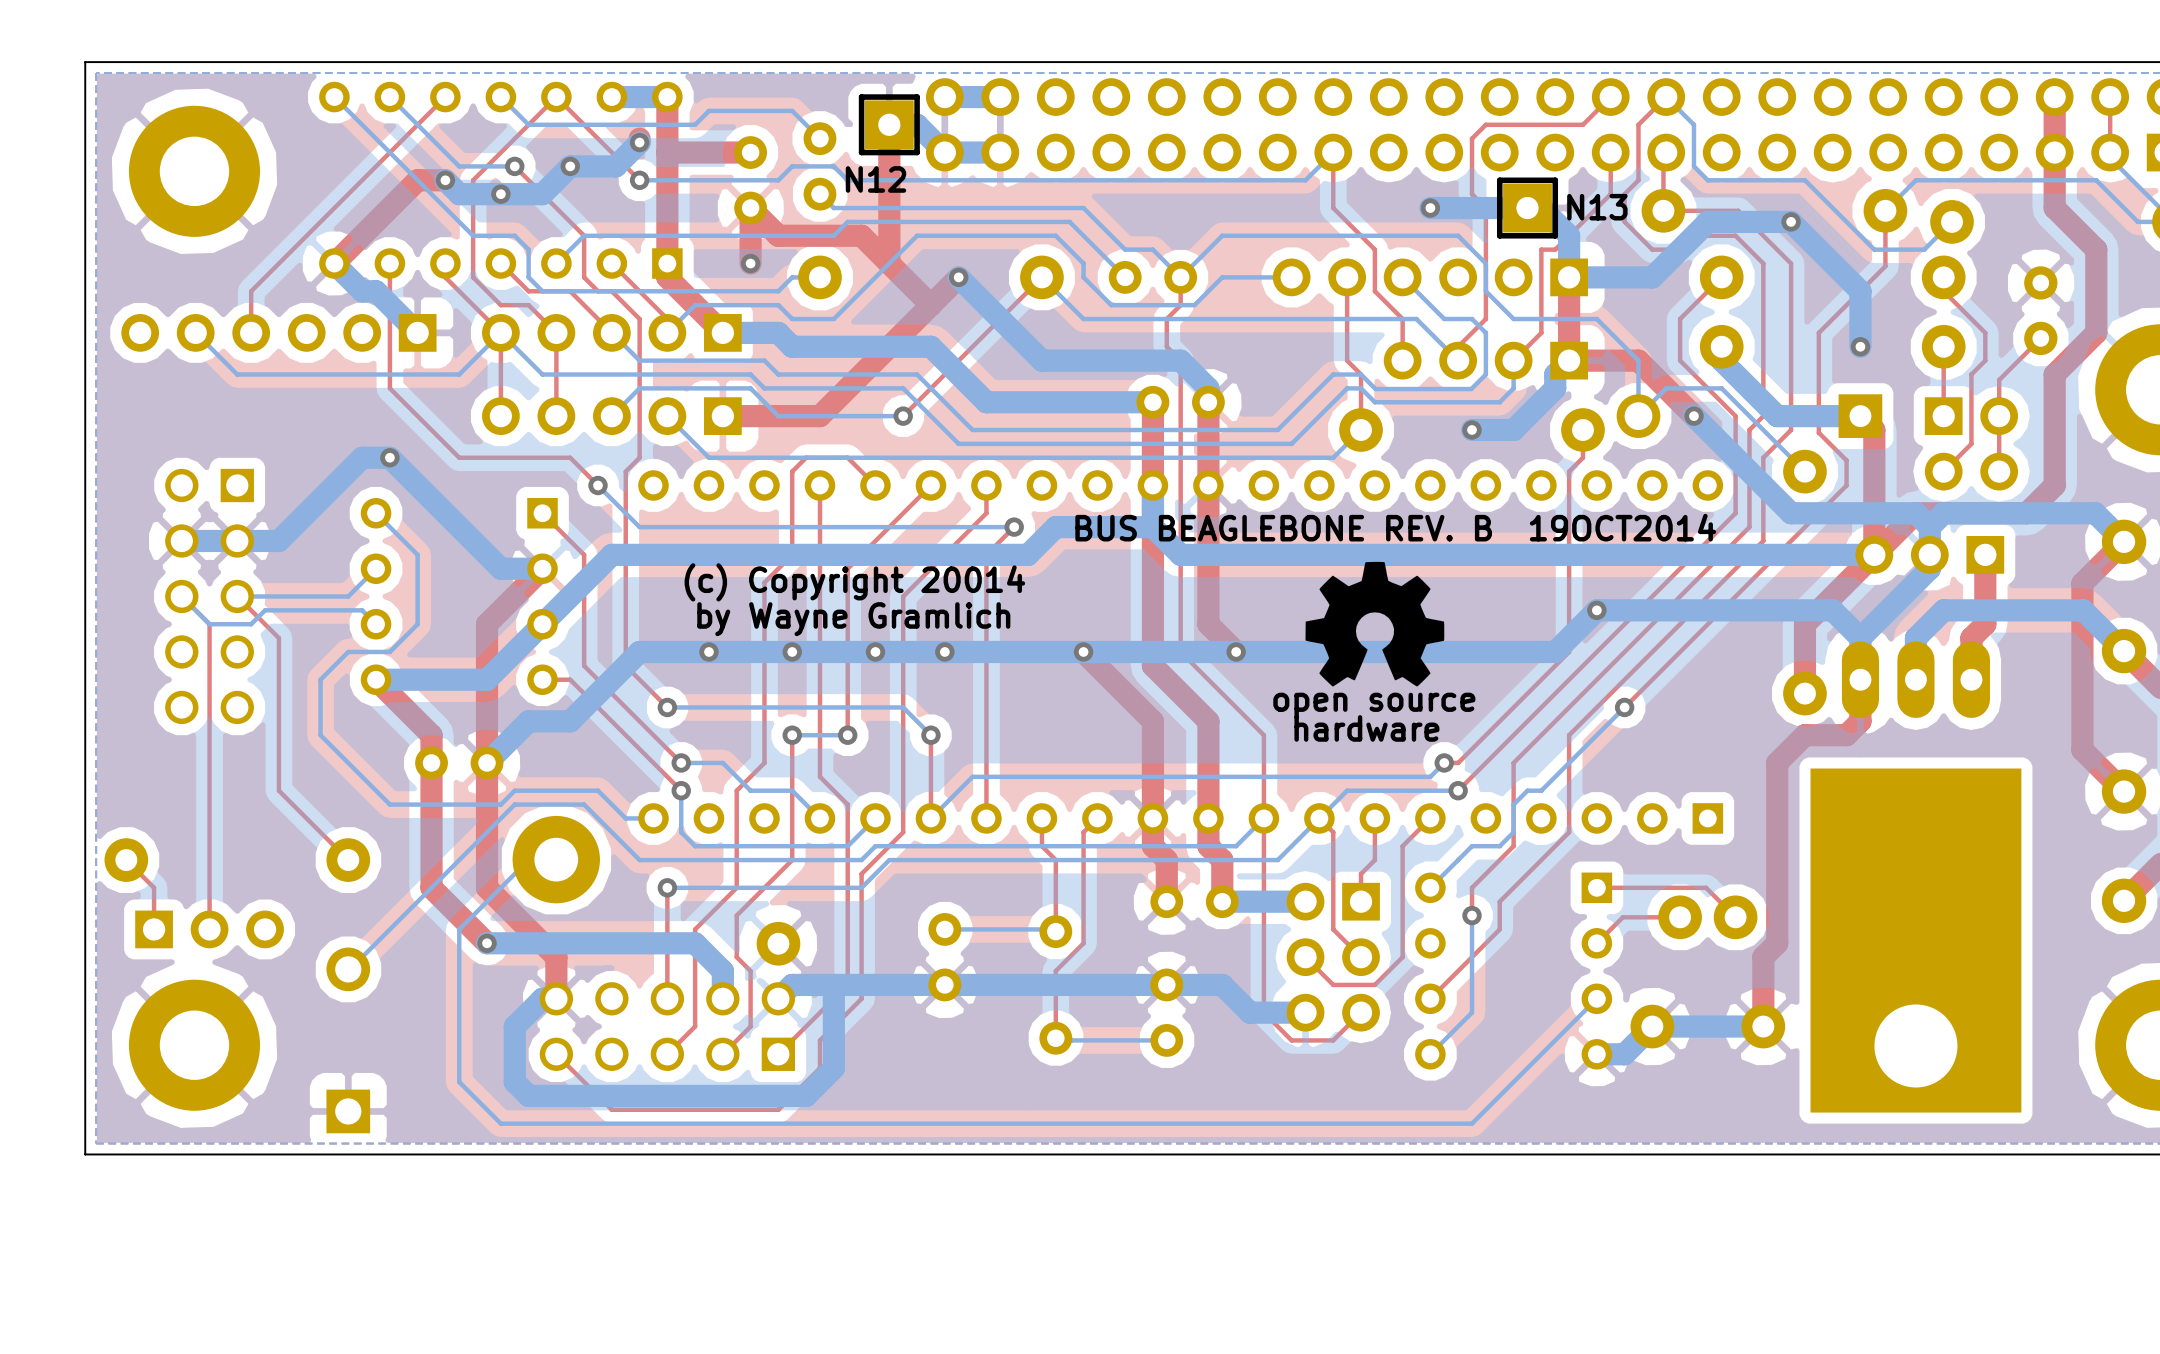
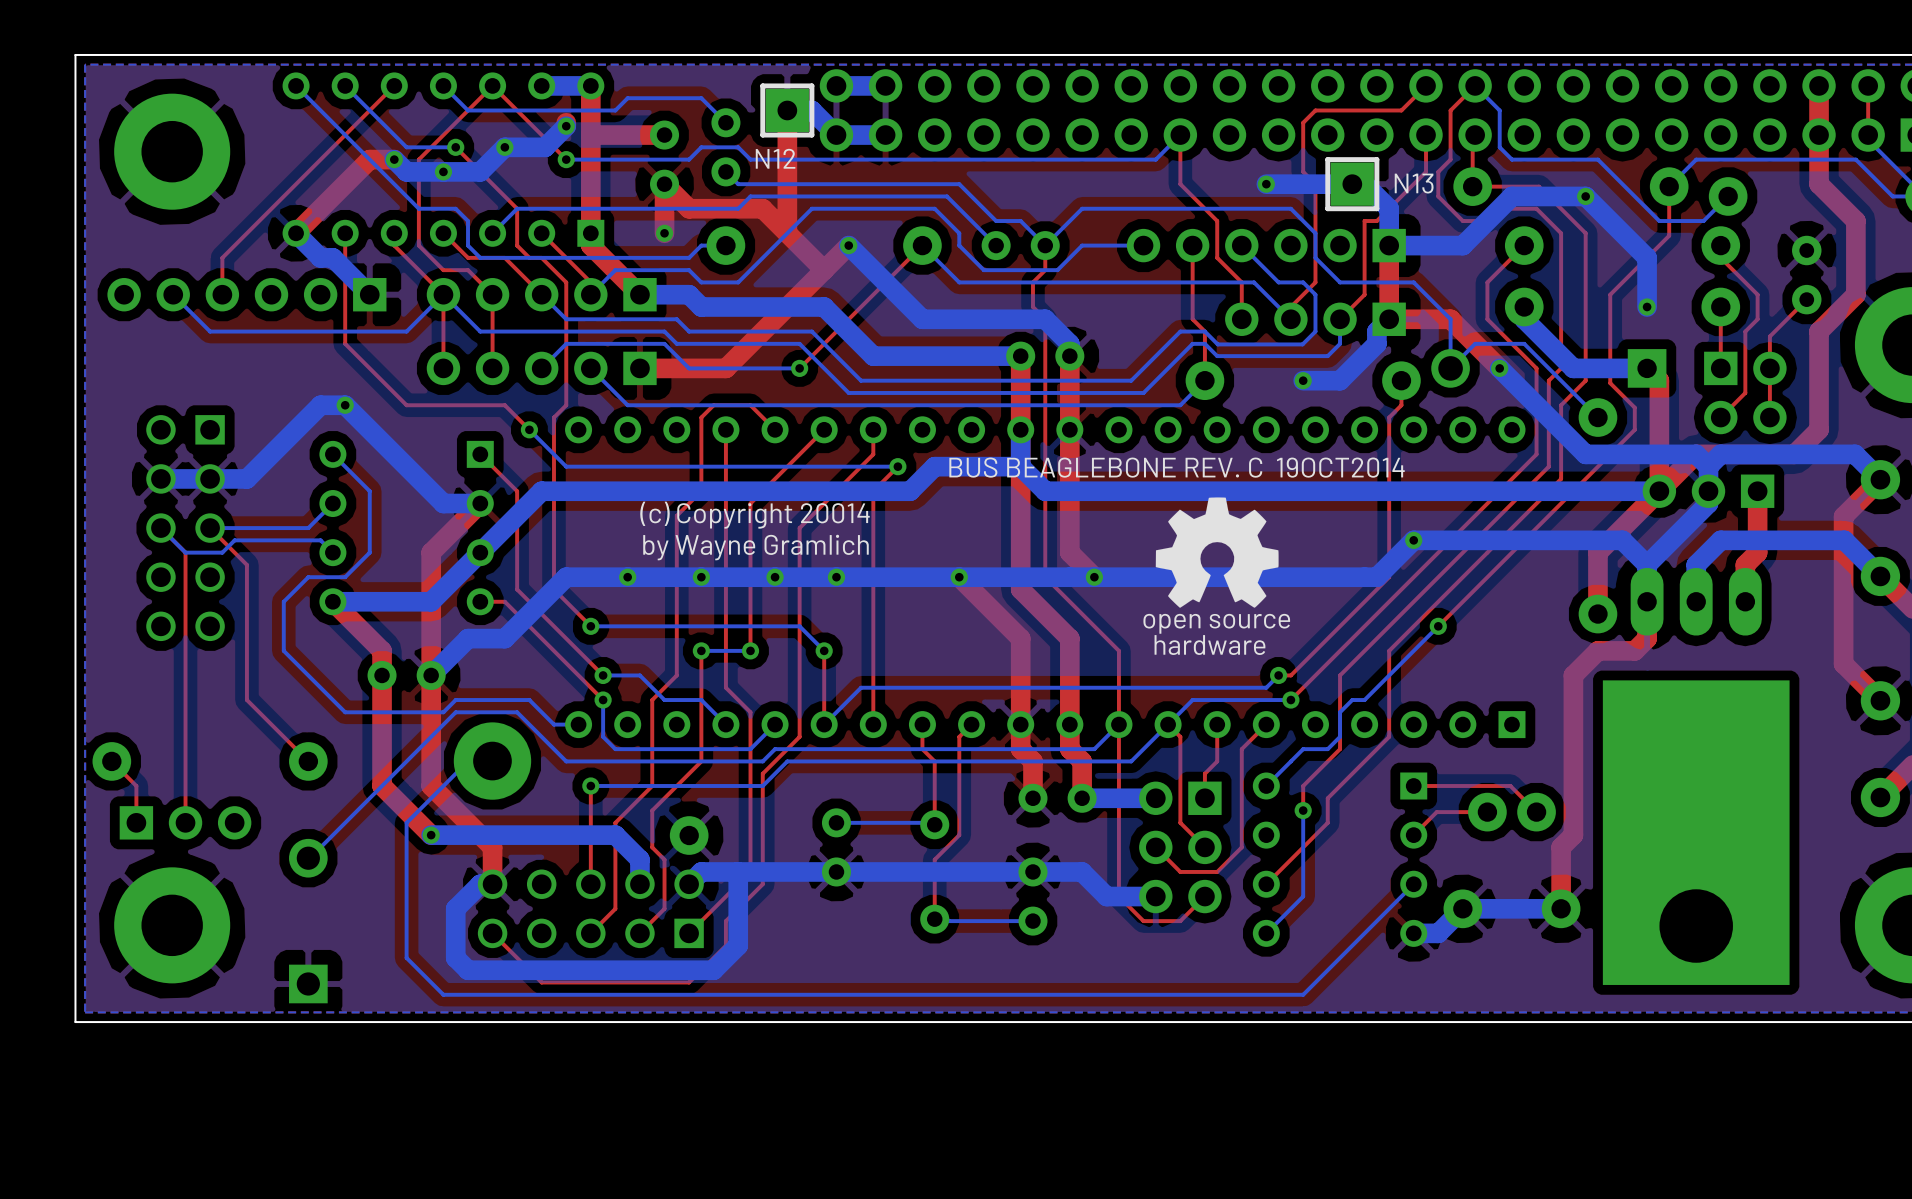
text: BUS BEAGLEBONE REV. B 19OCT2014 (1395, 527) -> BUS BEAGLEBONE REV. C 19OCT2014 (1177, 467)

